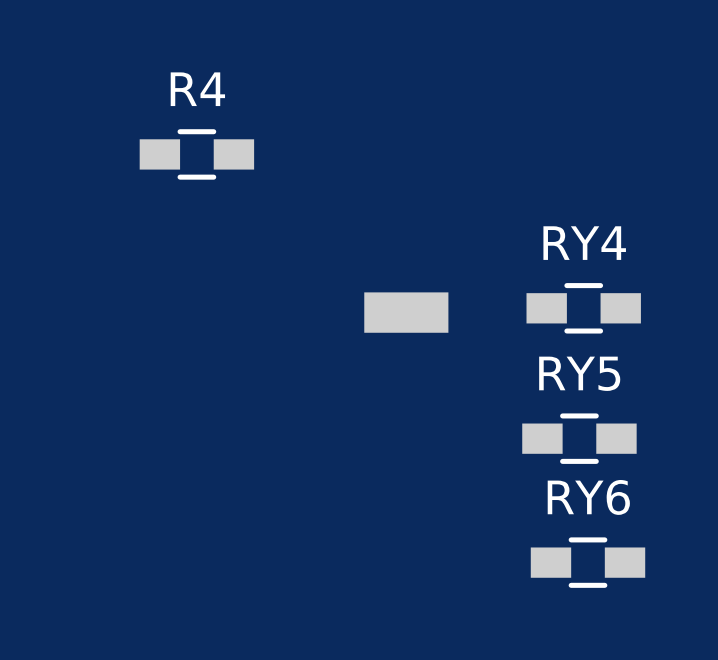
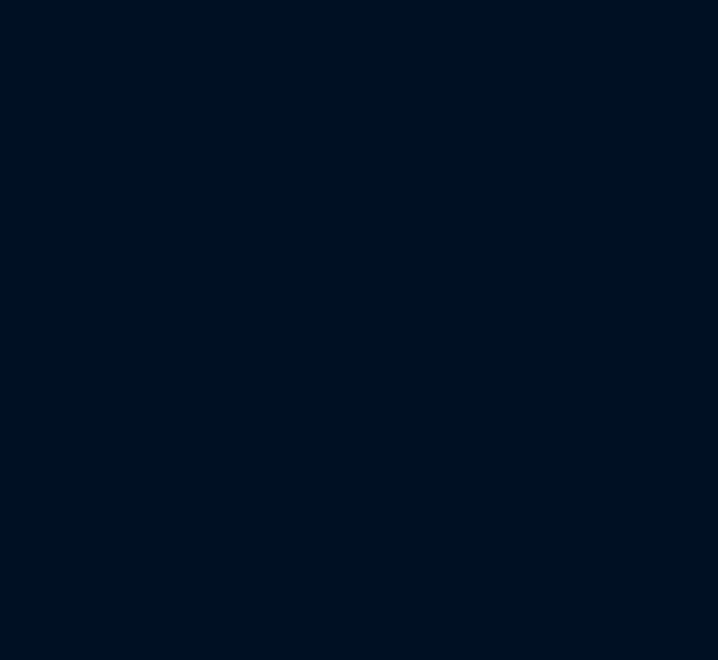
R4: (196, 154) -> none
RY4: (583, 308) -> none
part: (406, 312) -> none
RY5: (579, 438) -> none
RY6: (587, 562) -> none

